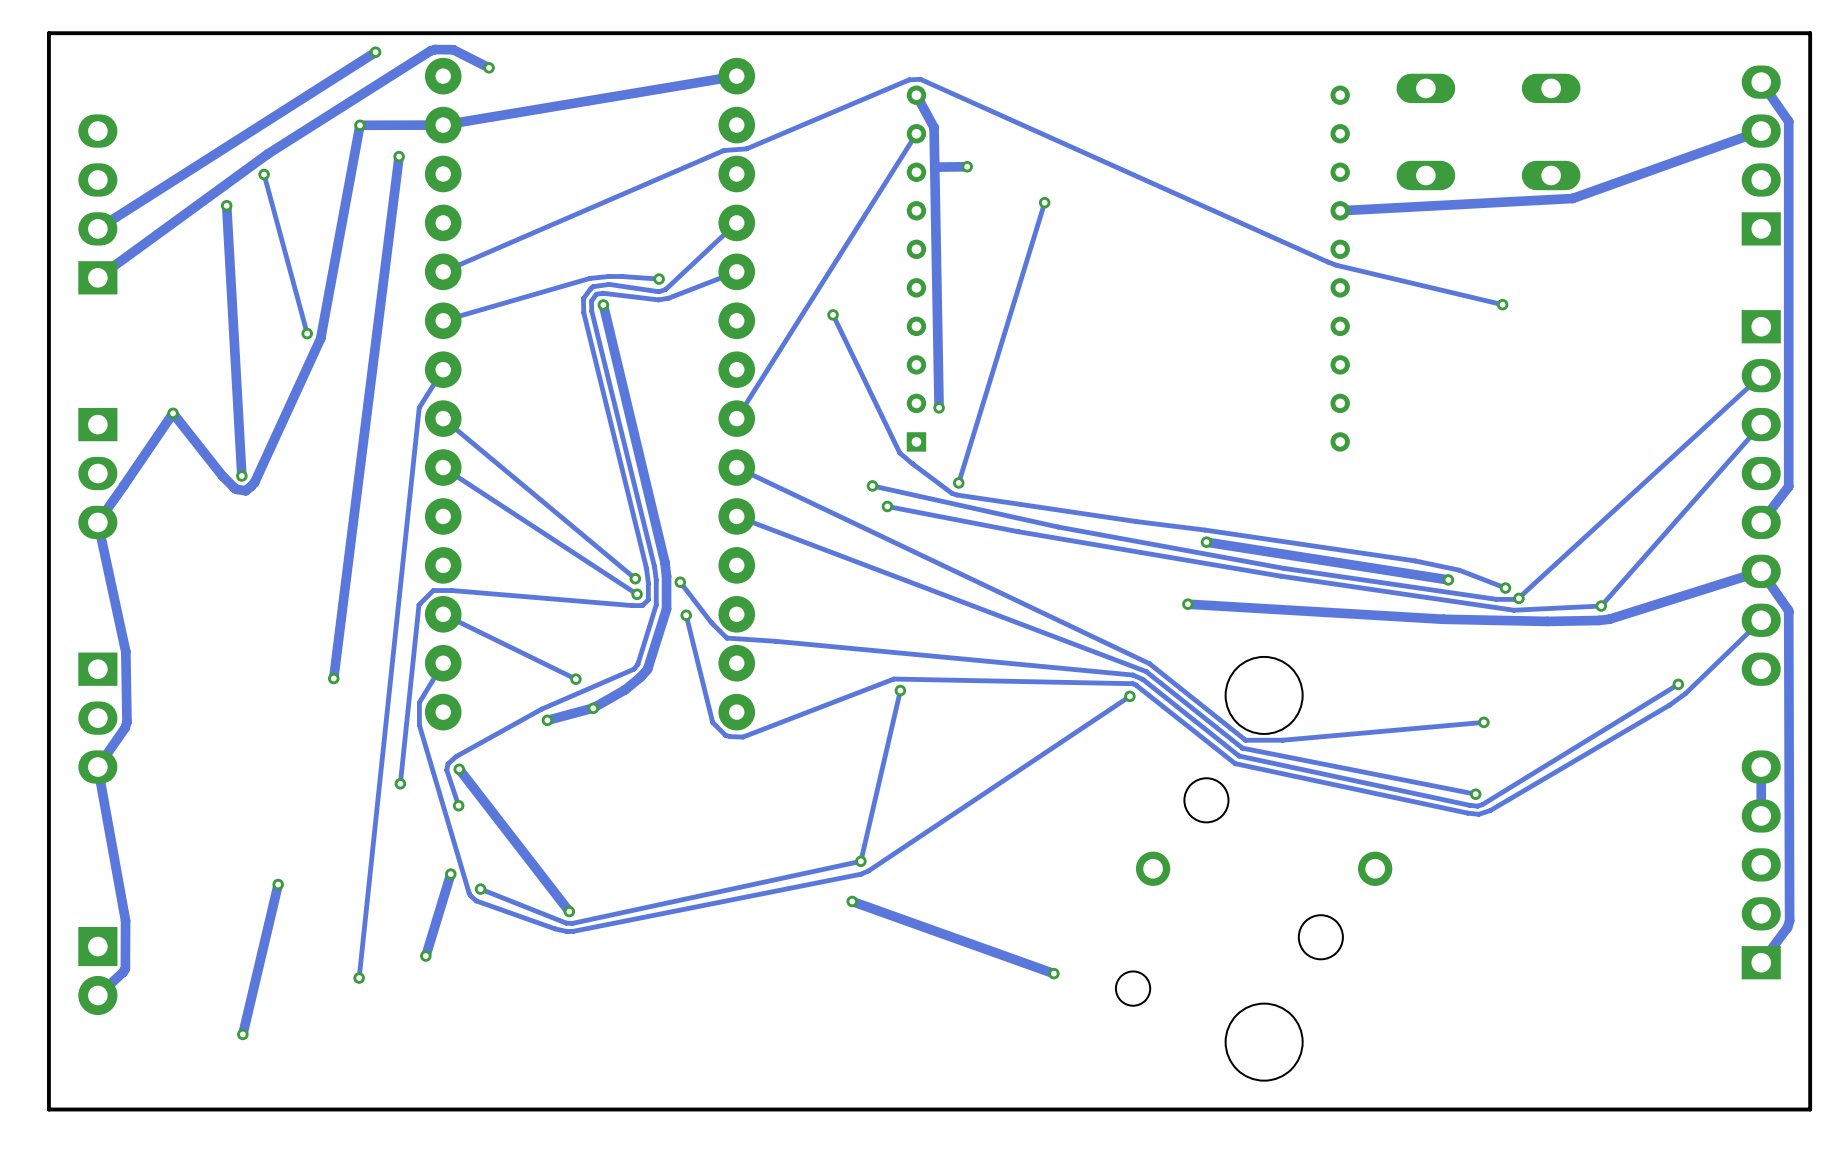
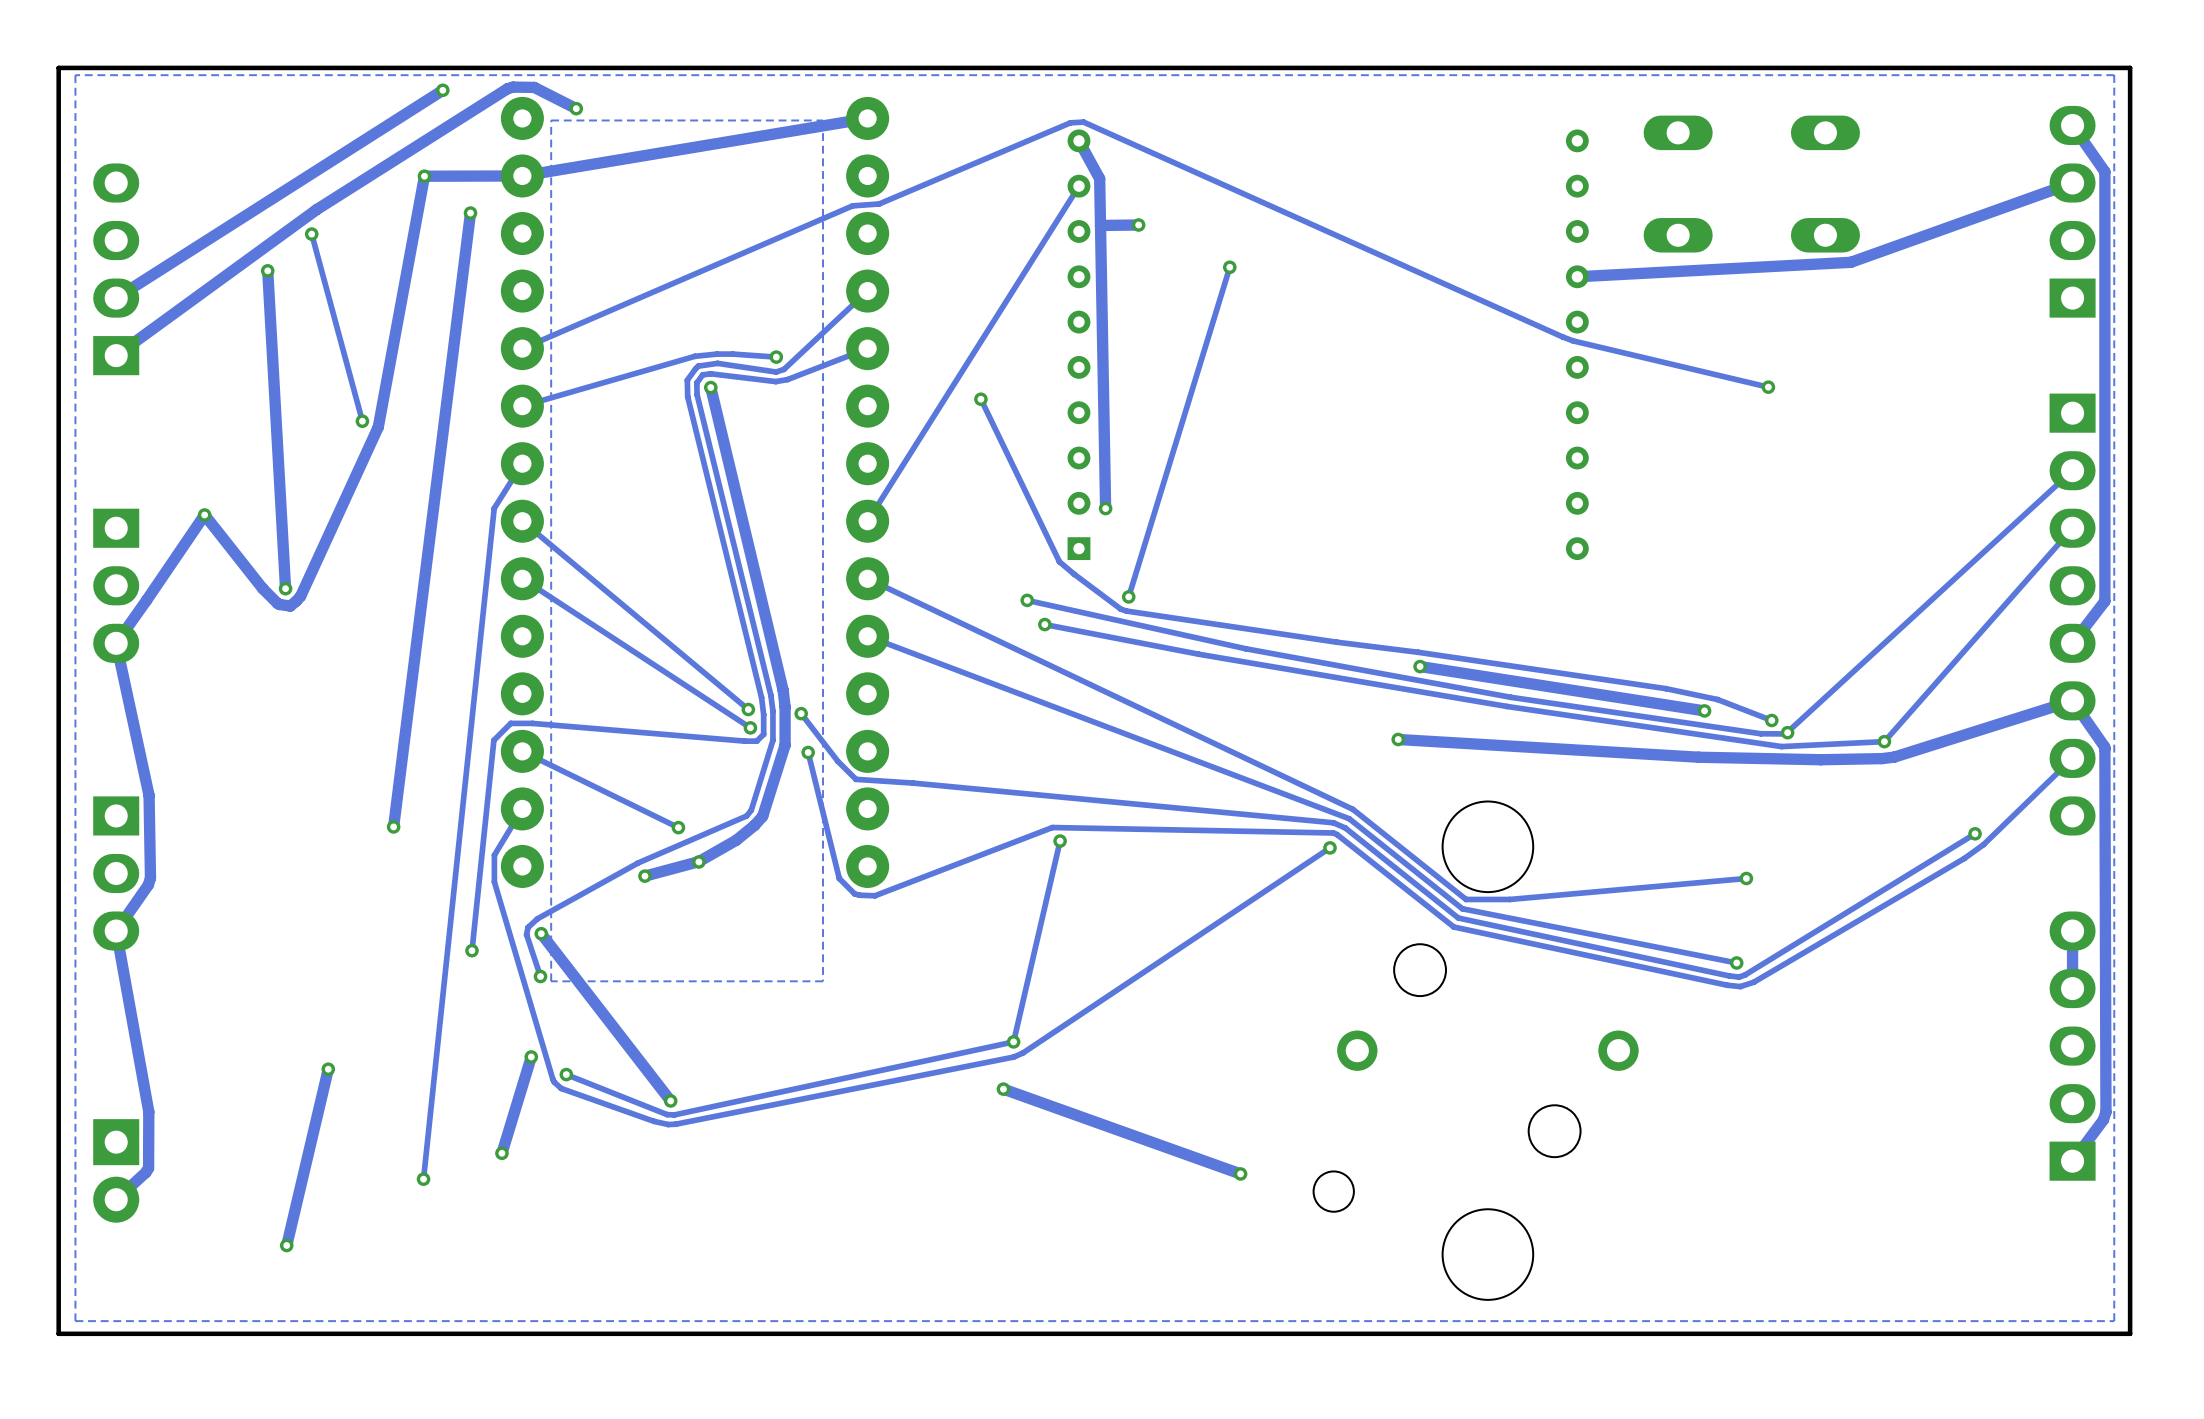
zone outline: none -> (2114, 75) (75, 75) (75, 1321) (2114, 1321) (2114, 75)
zone outline: none -> (823, 120) (551, 120) (551, 981) (823, 981) (823, 120)

